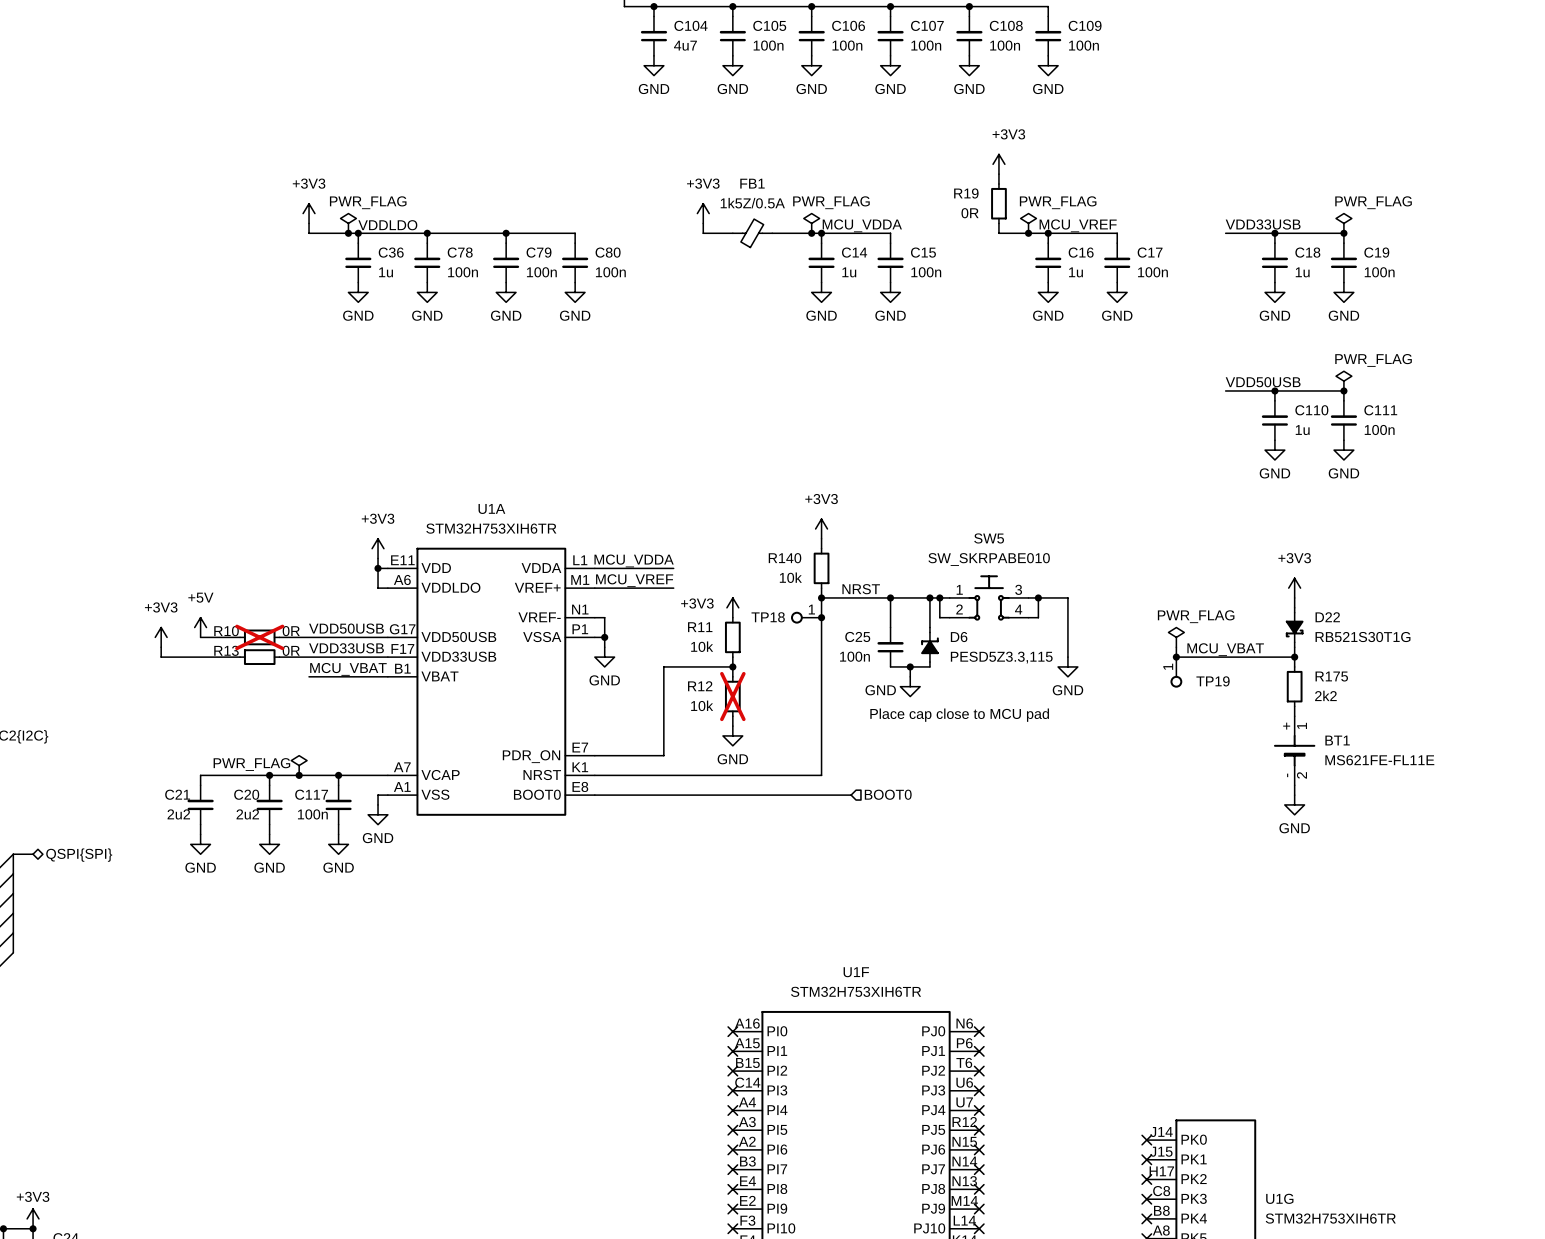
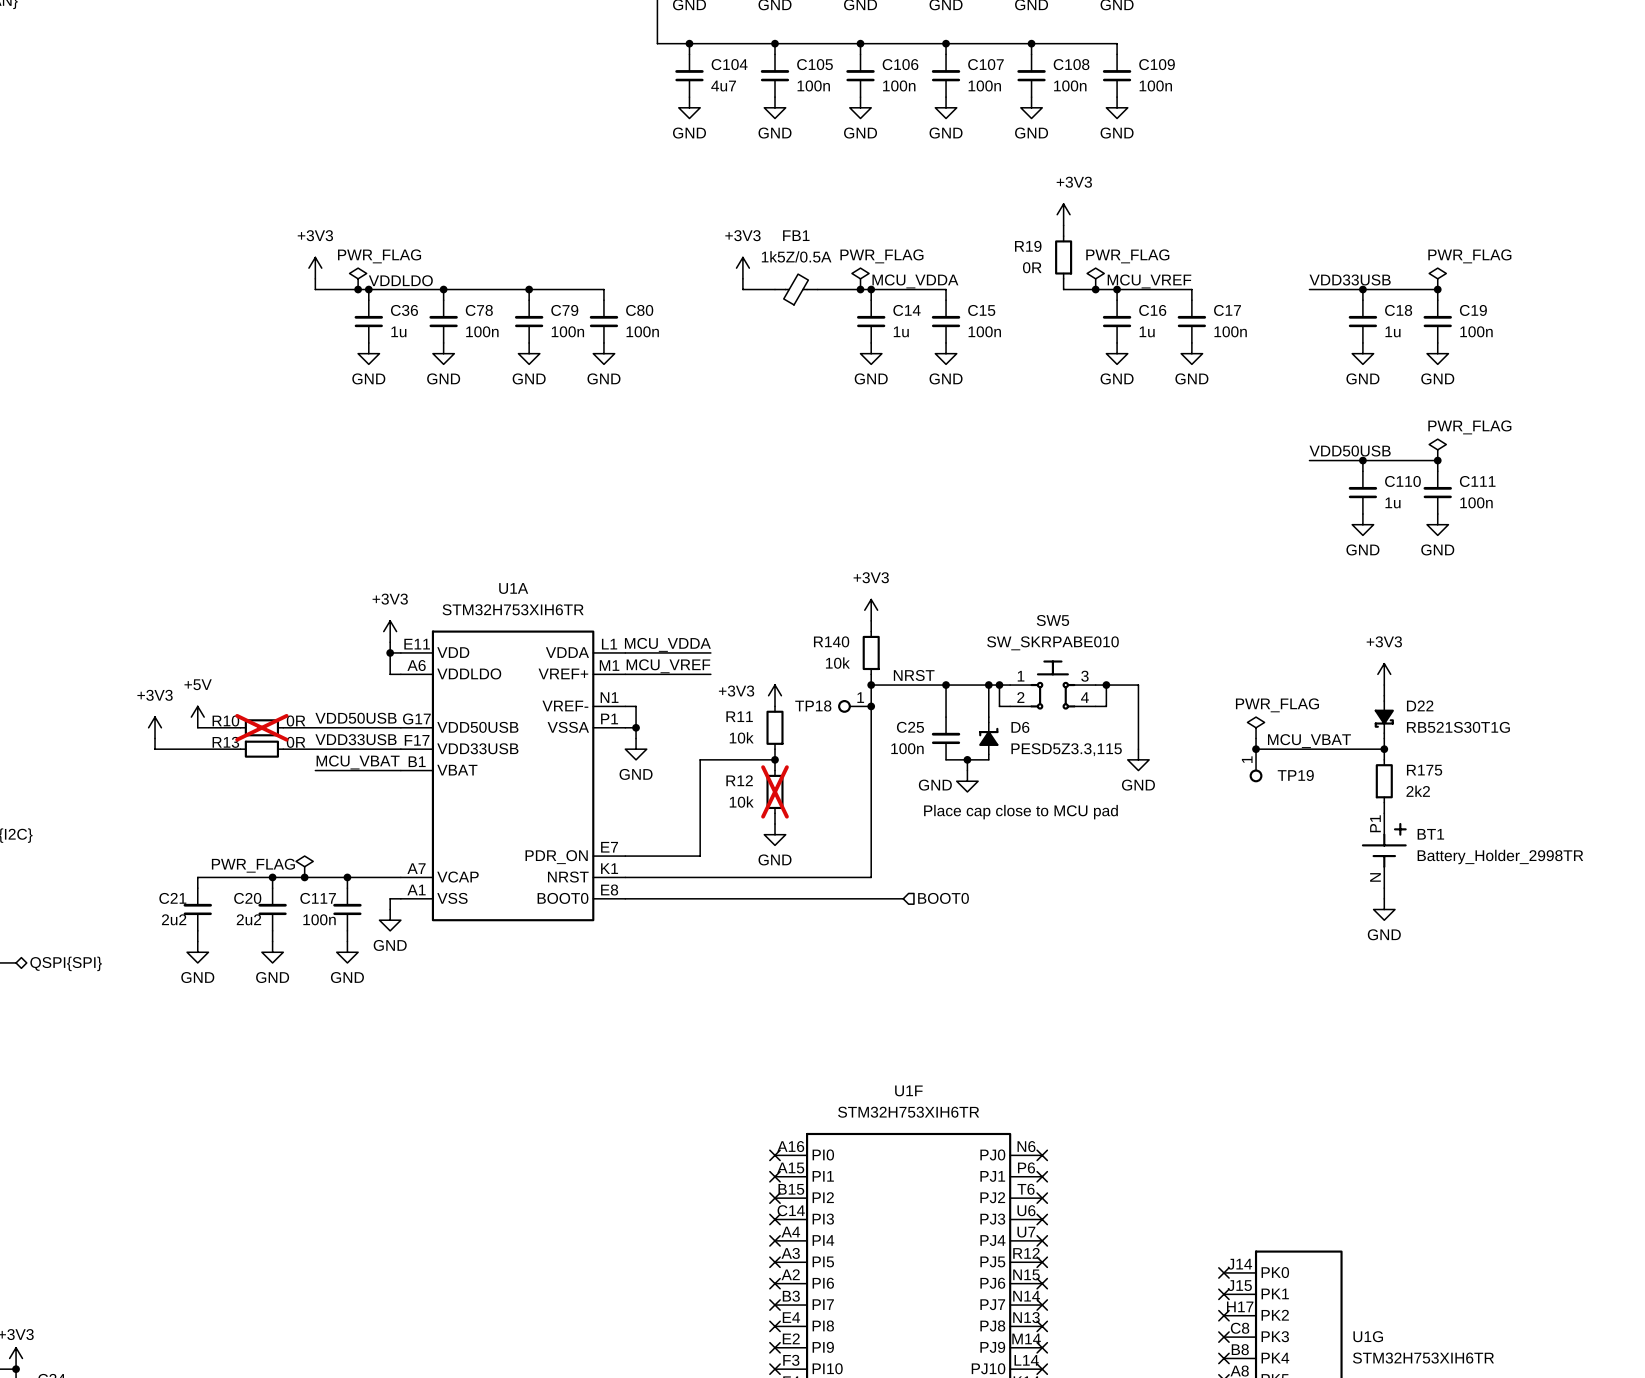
BT1 symbol: [1273, 716, 1316, 786] -> [1361, 813, 1407, 889]
BT1 value: none -> Battery_Holder_2998TR (1500, 856)
BT1 text: MS621FE-FL11E (1379, 760) -> none

